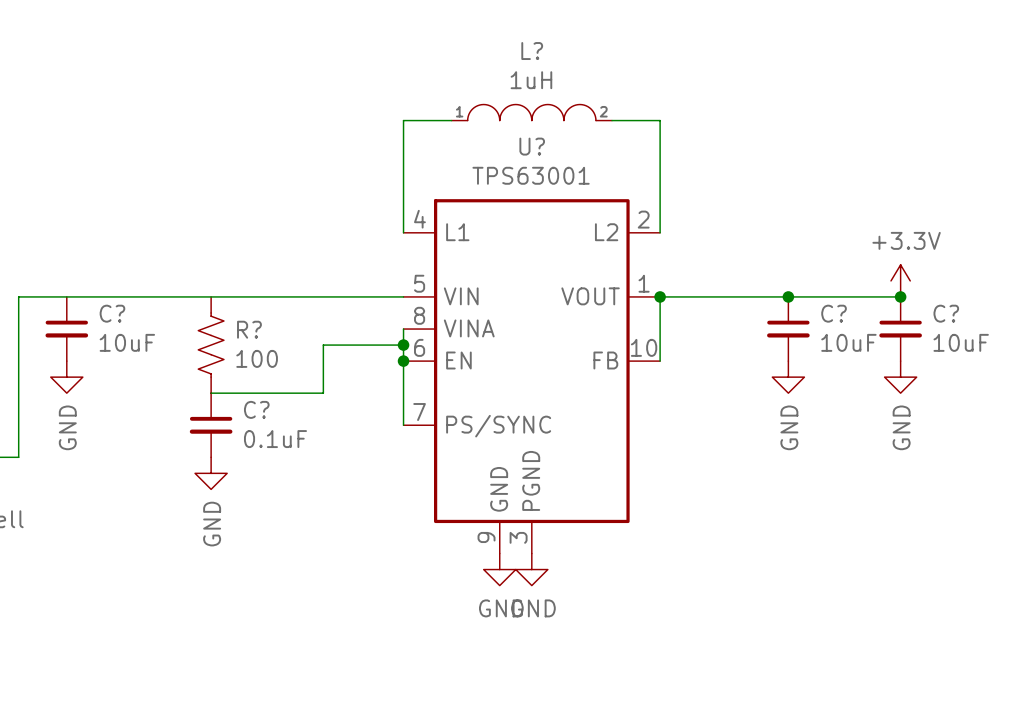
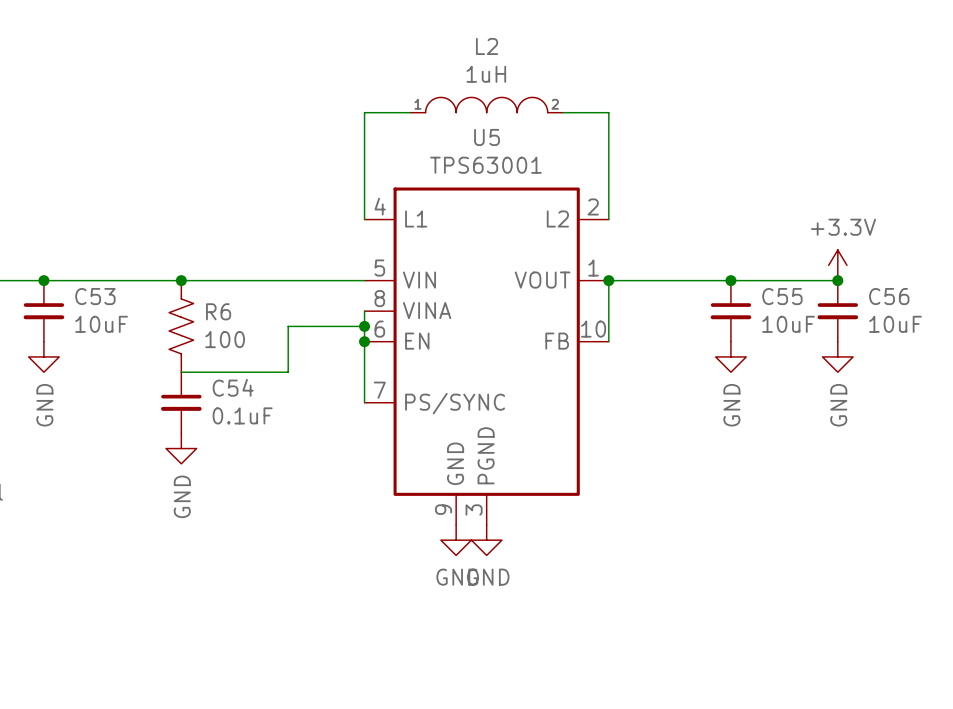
L? name: L? (532, 51) -> L2 (487, 46)
U? name: U? (532, 146) -> U5 (487, 137)
junction: none -> (43, 280)
junction: none -> (181, 280)
C? name: C? (112, 313) -> C53 (95, 296)
C? name: C? (834, 313) -> C55 (782, 296)
C? name: C? (946, 313) -> C56 (889, 296)
R? name: R? (249, 329) -> R6 (218, 311)
C? name: C? (256, 409) -> C54 (233, 387)

